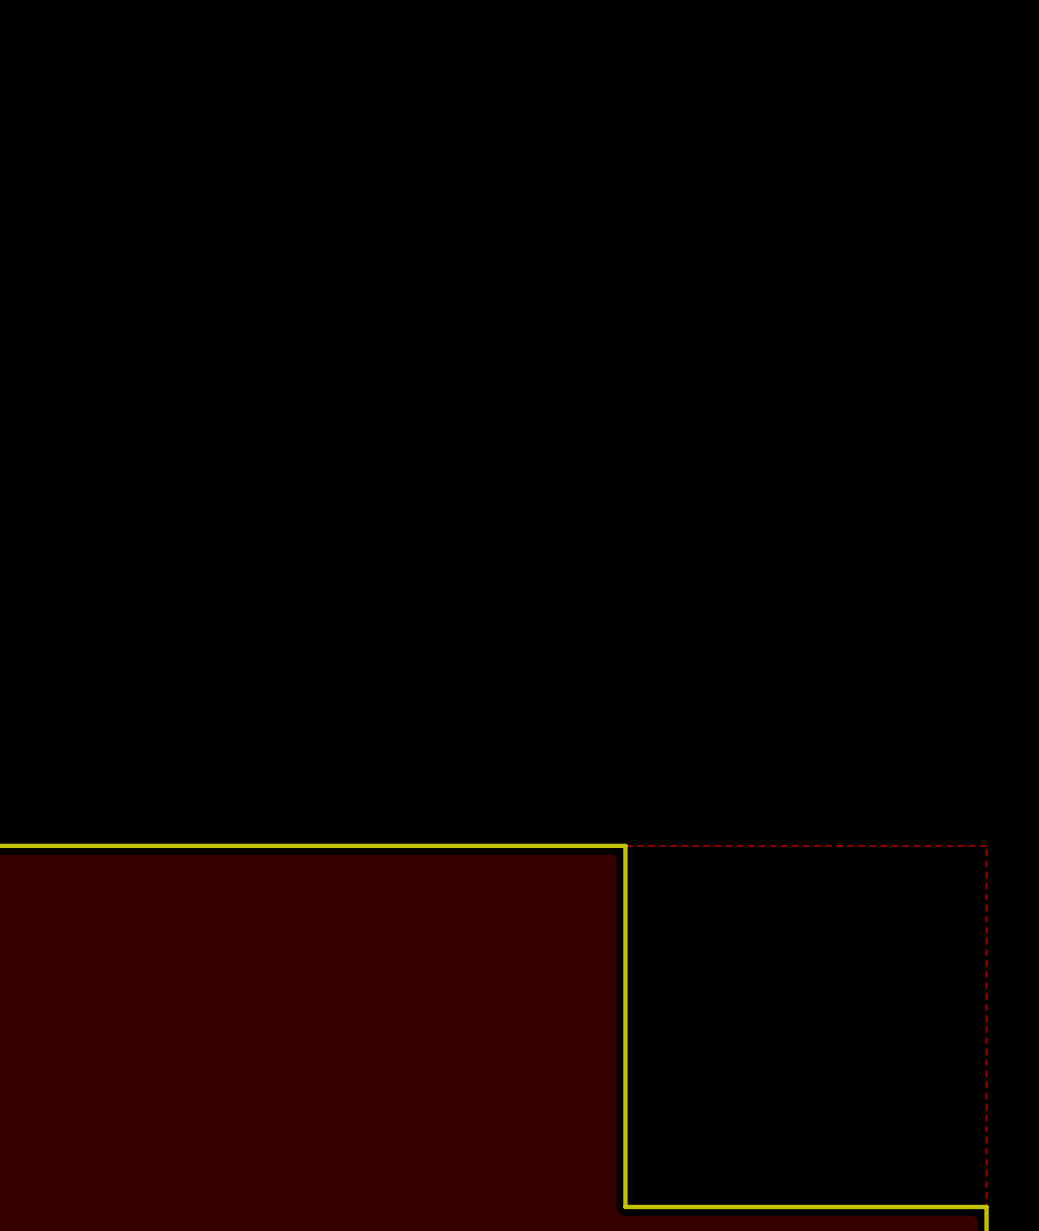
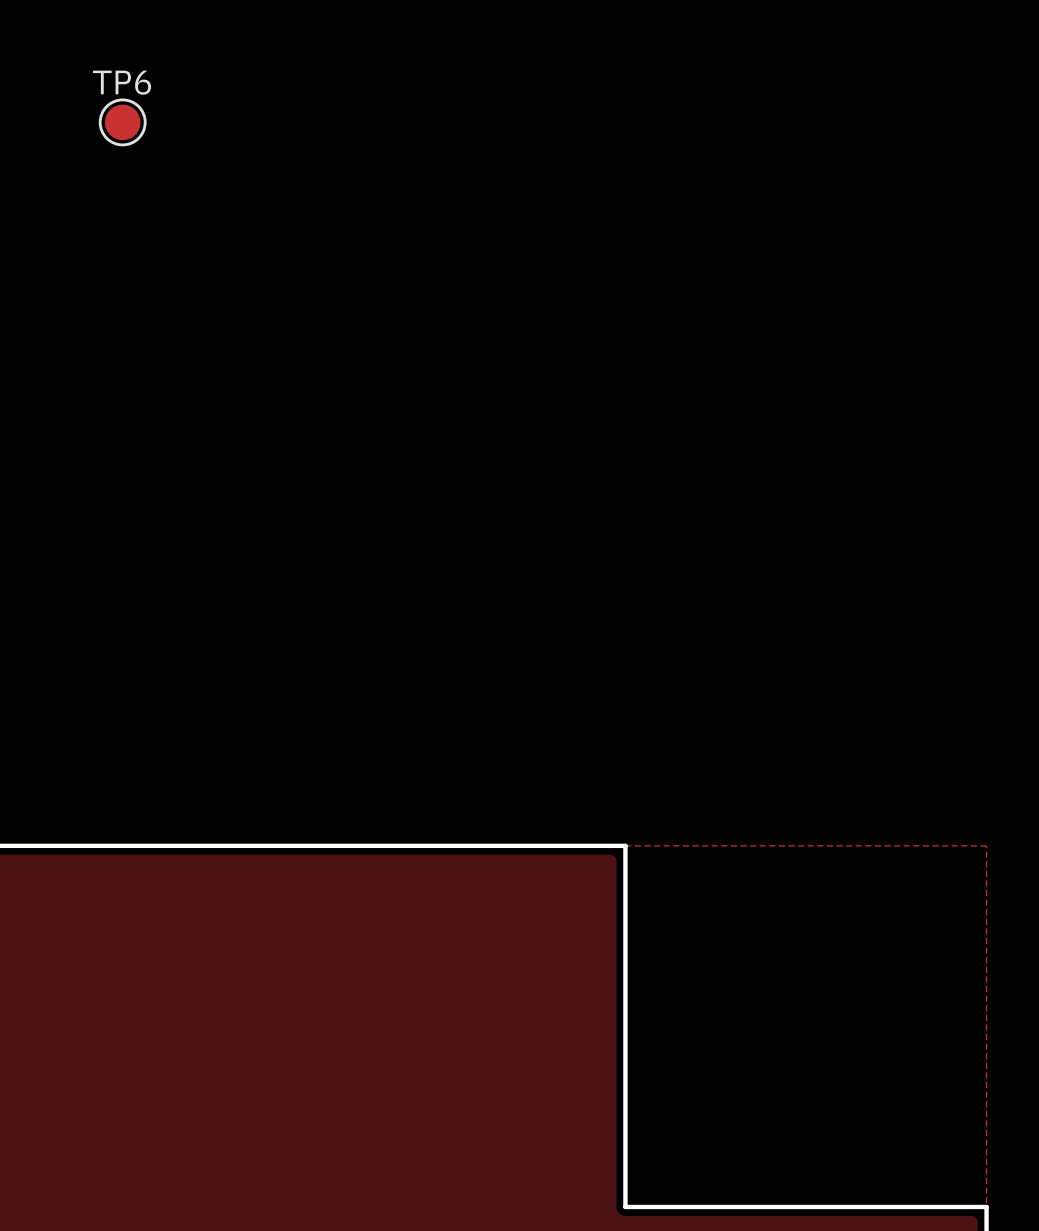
TP6: none -> (122, 122)

